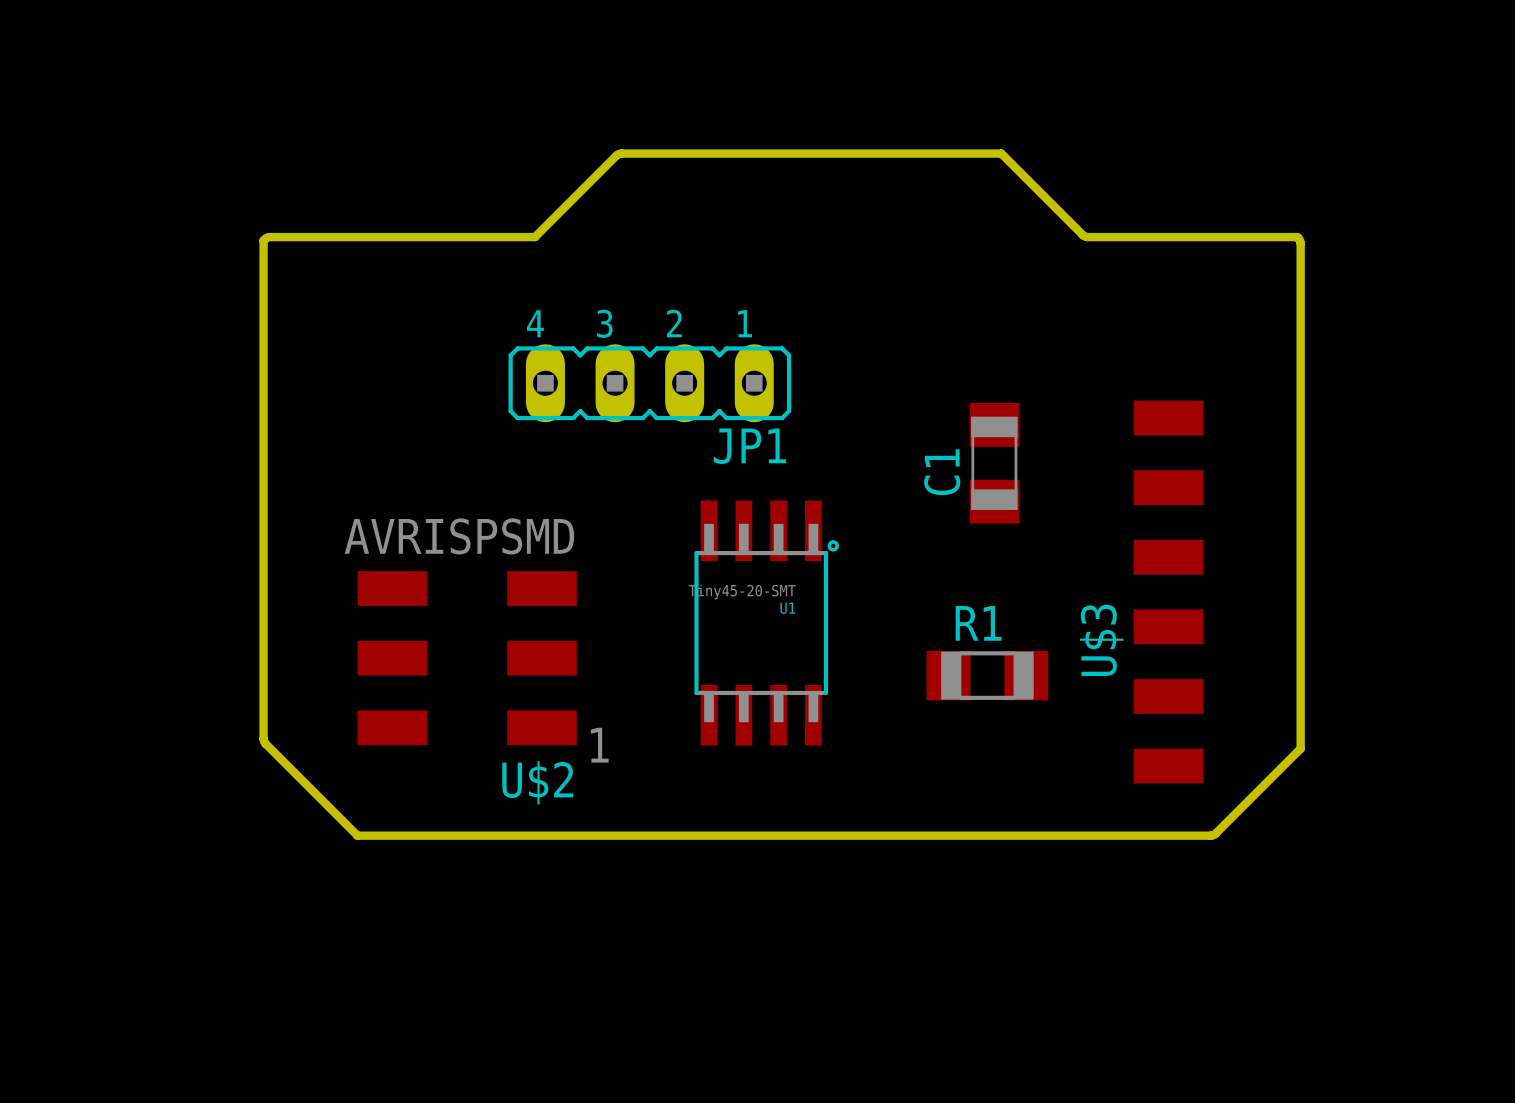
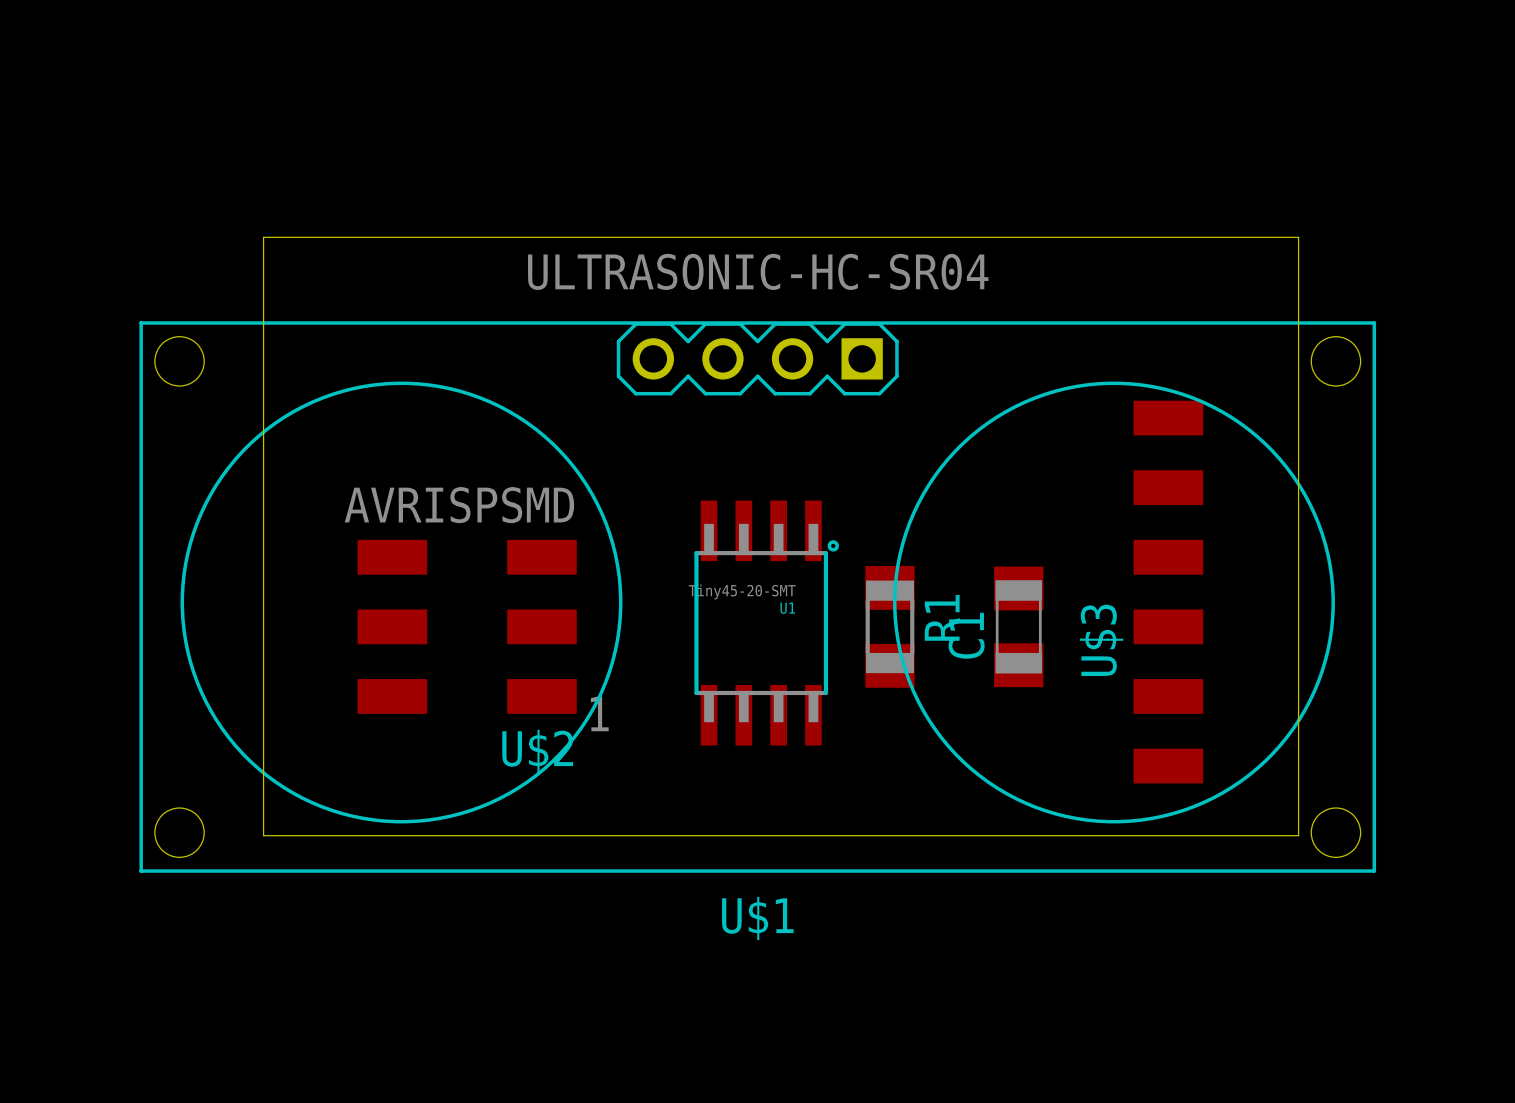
board edge: (263, 240) (269, 237) (535, 237) (616, 155) (621, 153) (1001, 153) (1085, 236) (1297, 237) (1300, 243) (1300, 748) (1215, 833) (1210, 835) -> (263, 237) (1298, 237) (1298, 835) (1210, 835)
board edge width: thick (263, 240) (263, 738) -> thin (263, 240) (263, 738)
JP1: (649, 383) -> none
C1 position: (994, 463) -> (1018, 626)
U$1: none -> ULTRASONIC-HC-SR04 (757, 597)
U$2 position: (467, 658) -> (467, 626)
R1 rotation: 0° (987, 675) -> 90° clockwise (889, 626)
R1 position: (987, 675) -> (889, 626)
board edge: (263, 738) (265, 743) (357, 835) -> (263, 738) (263, 835) (357, 835)
board edge width: thick (357, 835) (1210, 835) -> thin (357, 835) (1210, 835)

